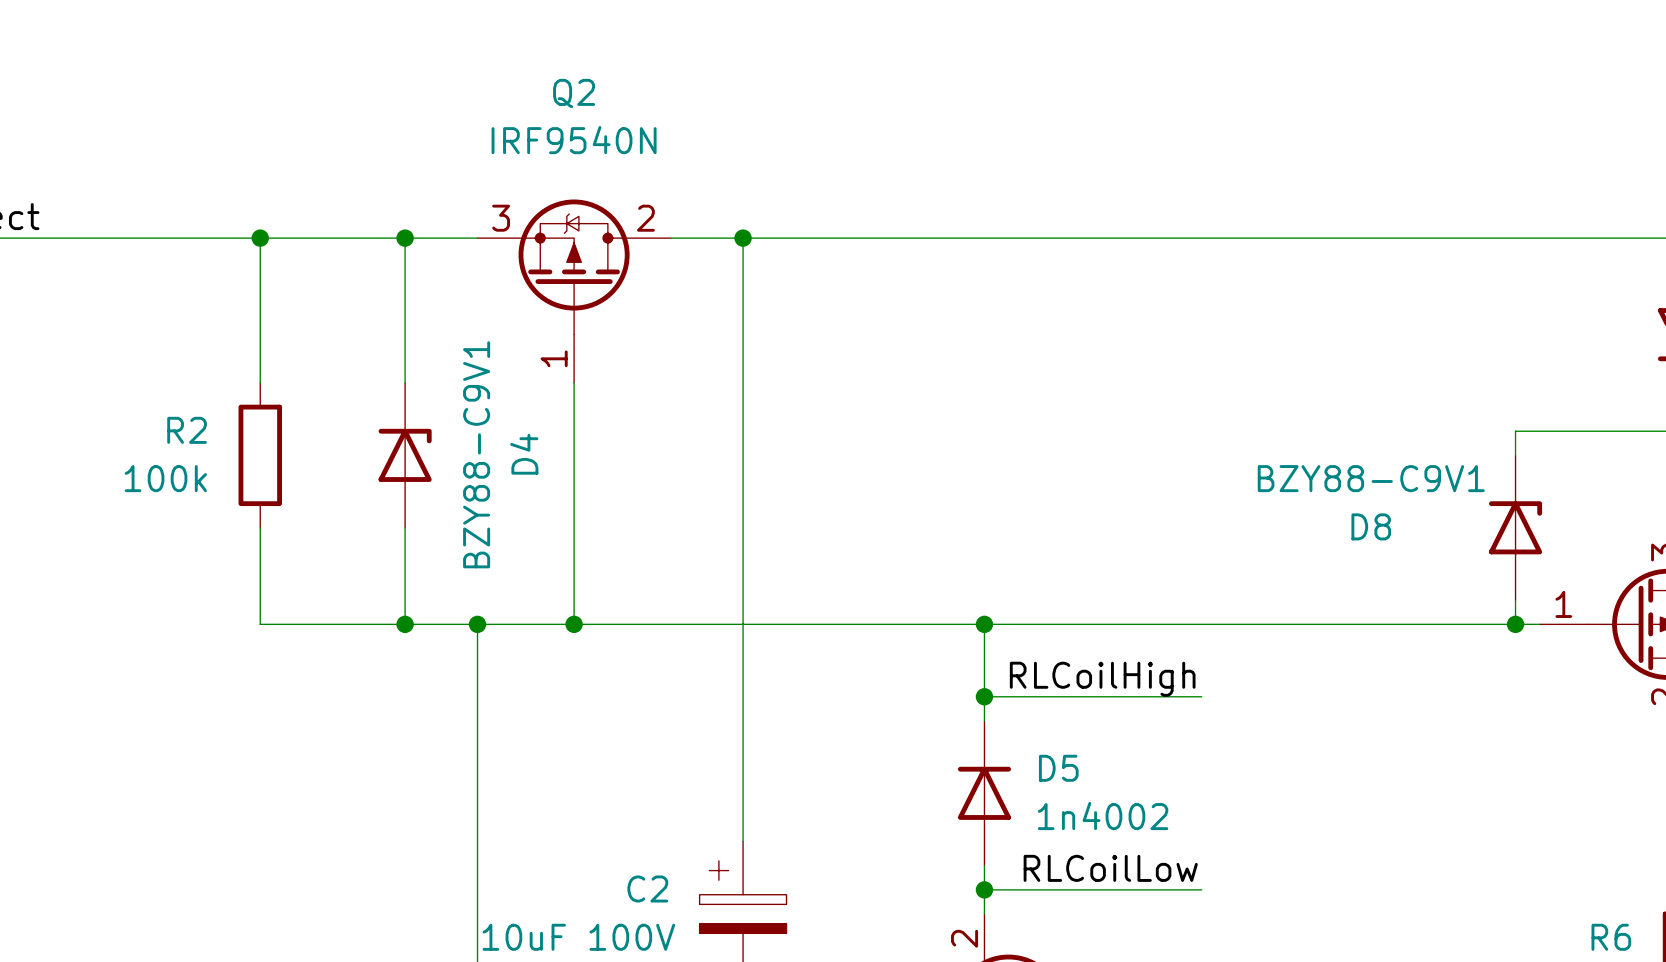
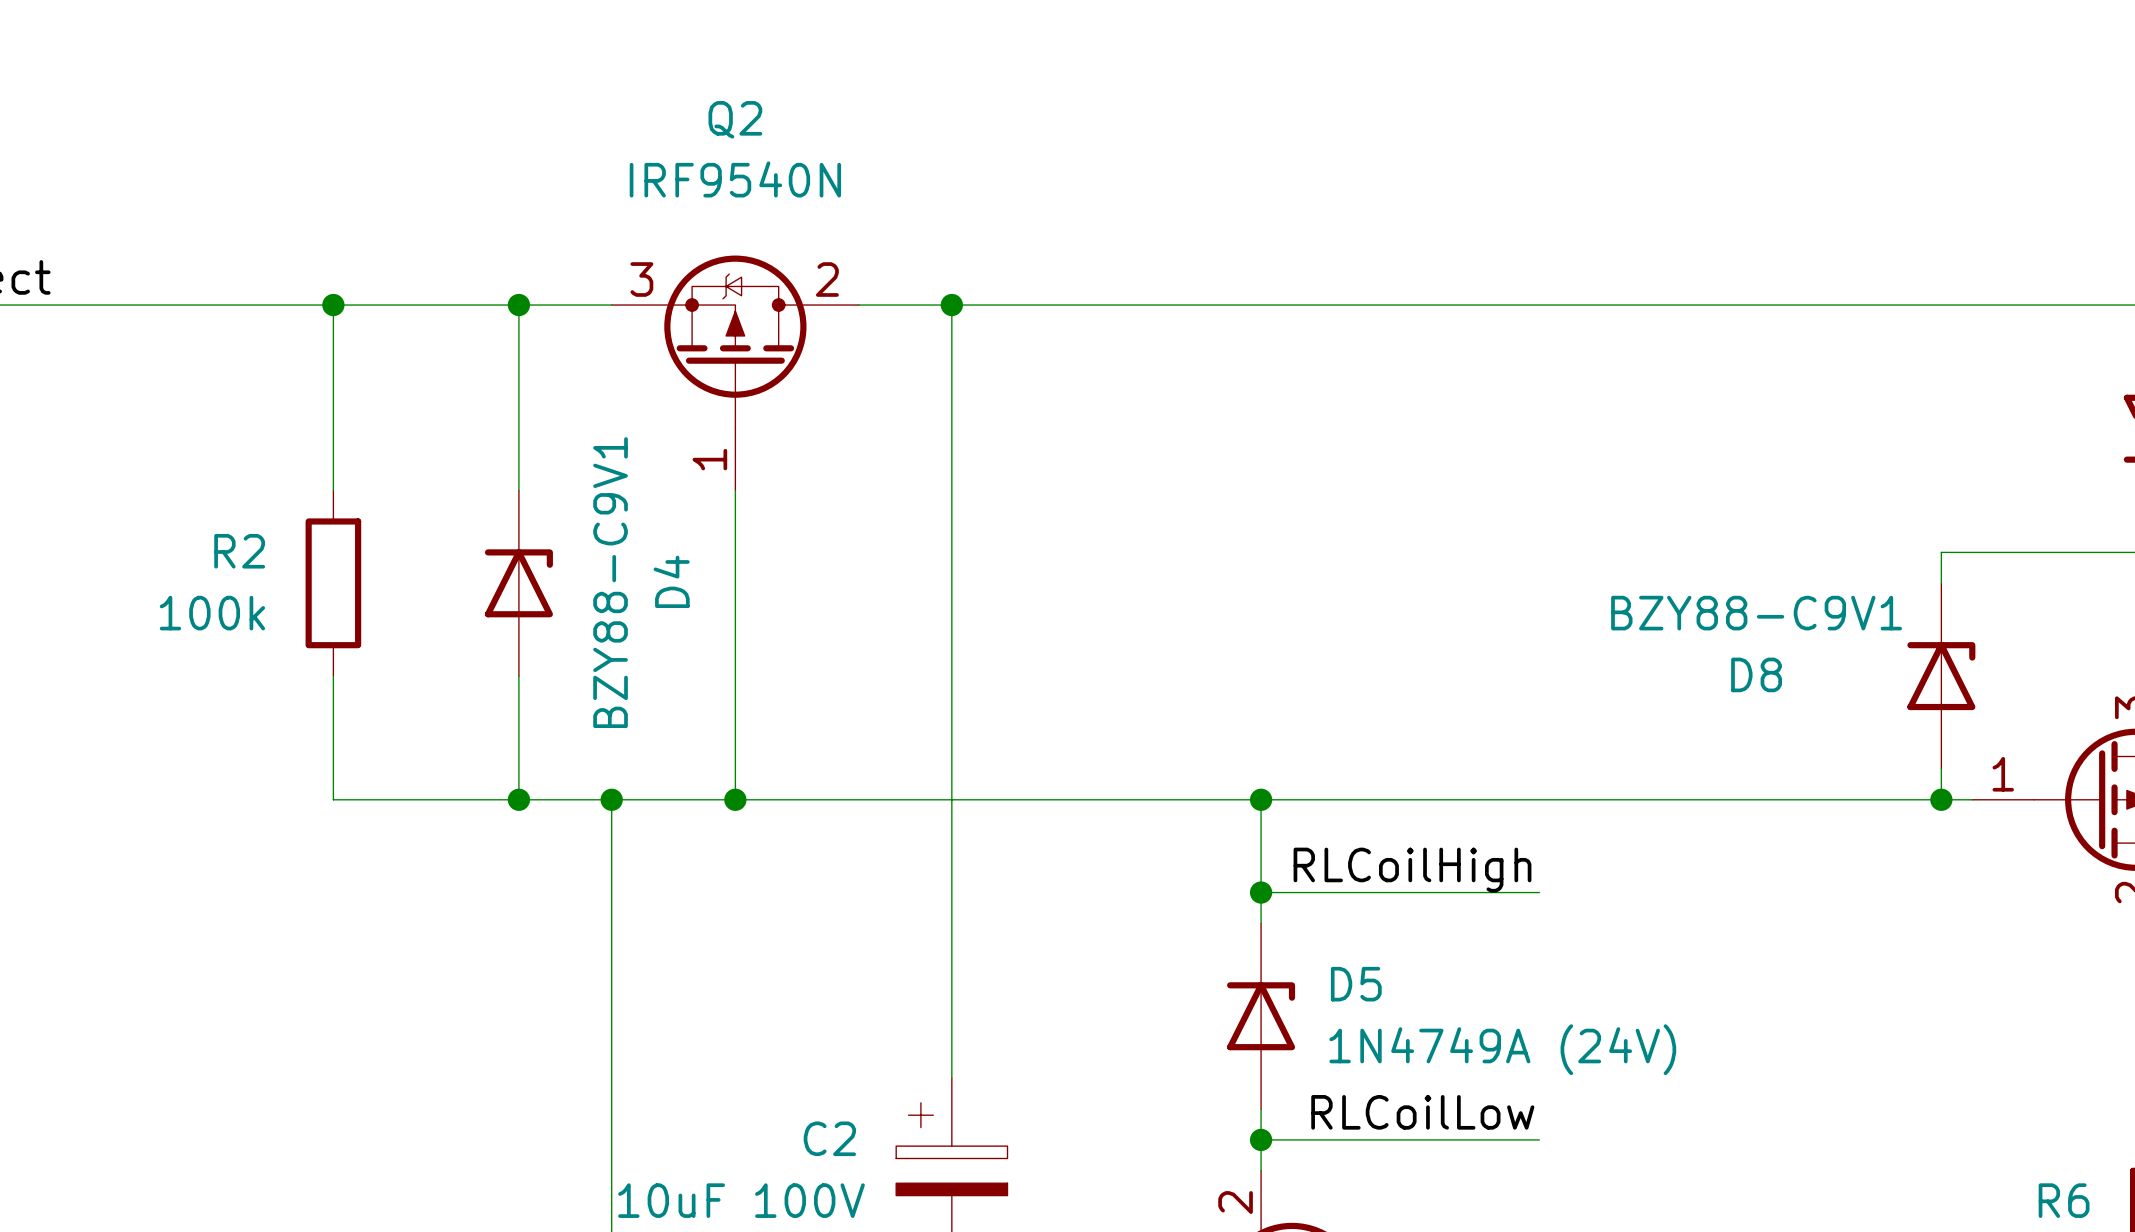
D5 symbol: [957, 720, 1012, 866] -> [1227, 923, 1296, 1110]
D5 value: 1n4002 (1103, 816) -> 1N4749A (24V) (1502, 1049)

